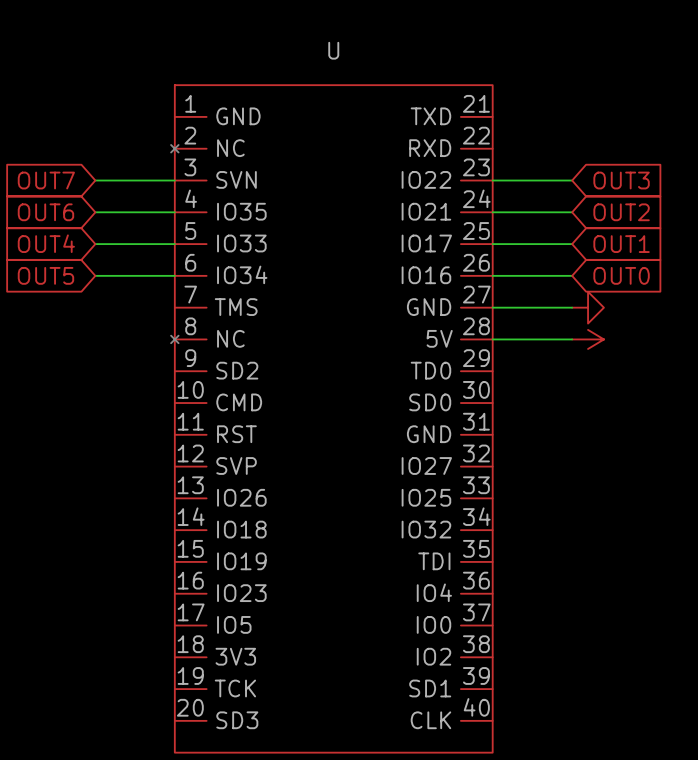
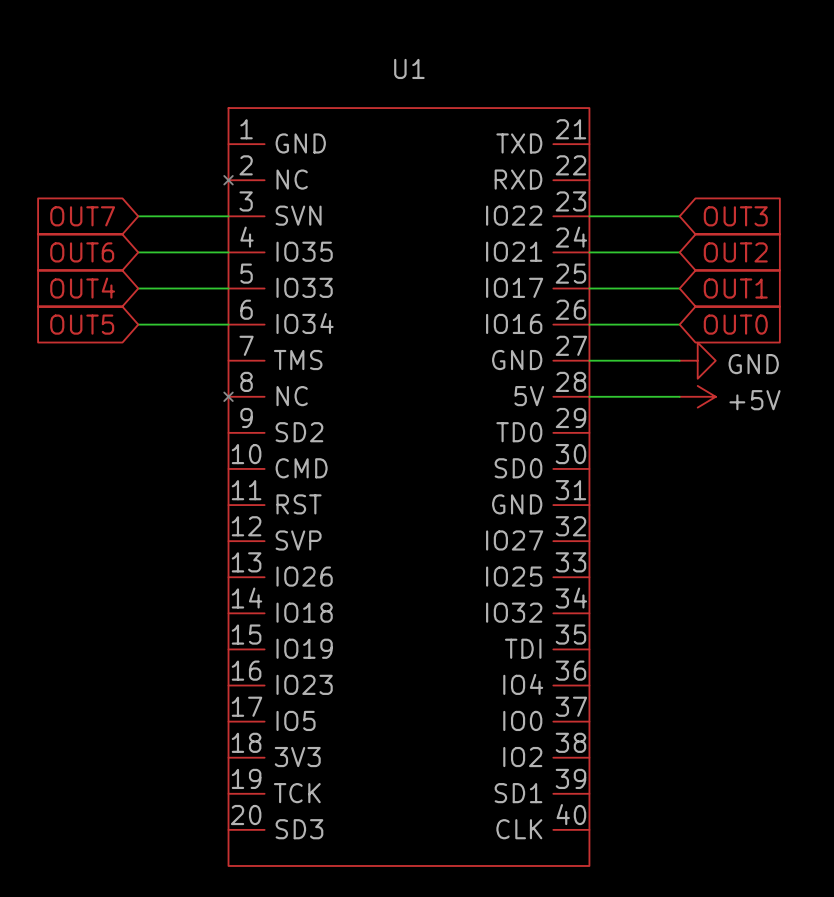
U name: U (333, 50) -> U1 (409, 68)
power symbol text: none -> GND (753, 364)
power symbol text: none -> +5V (754, 400)

